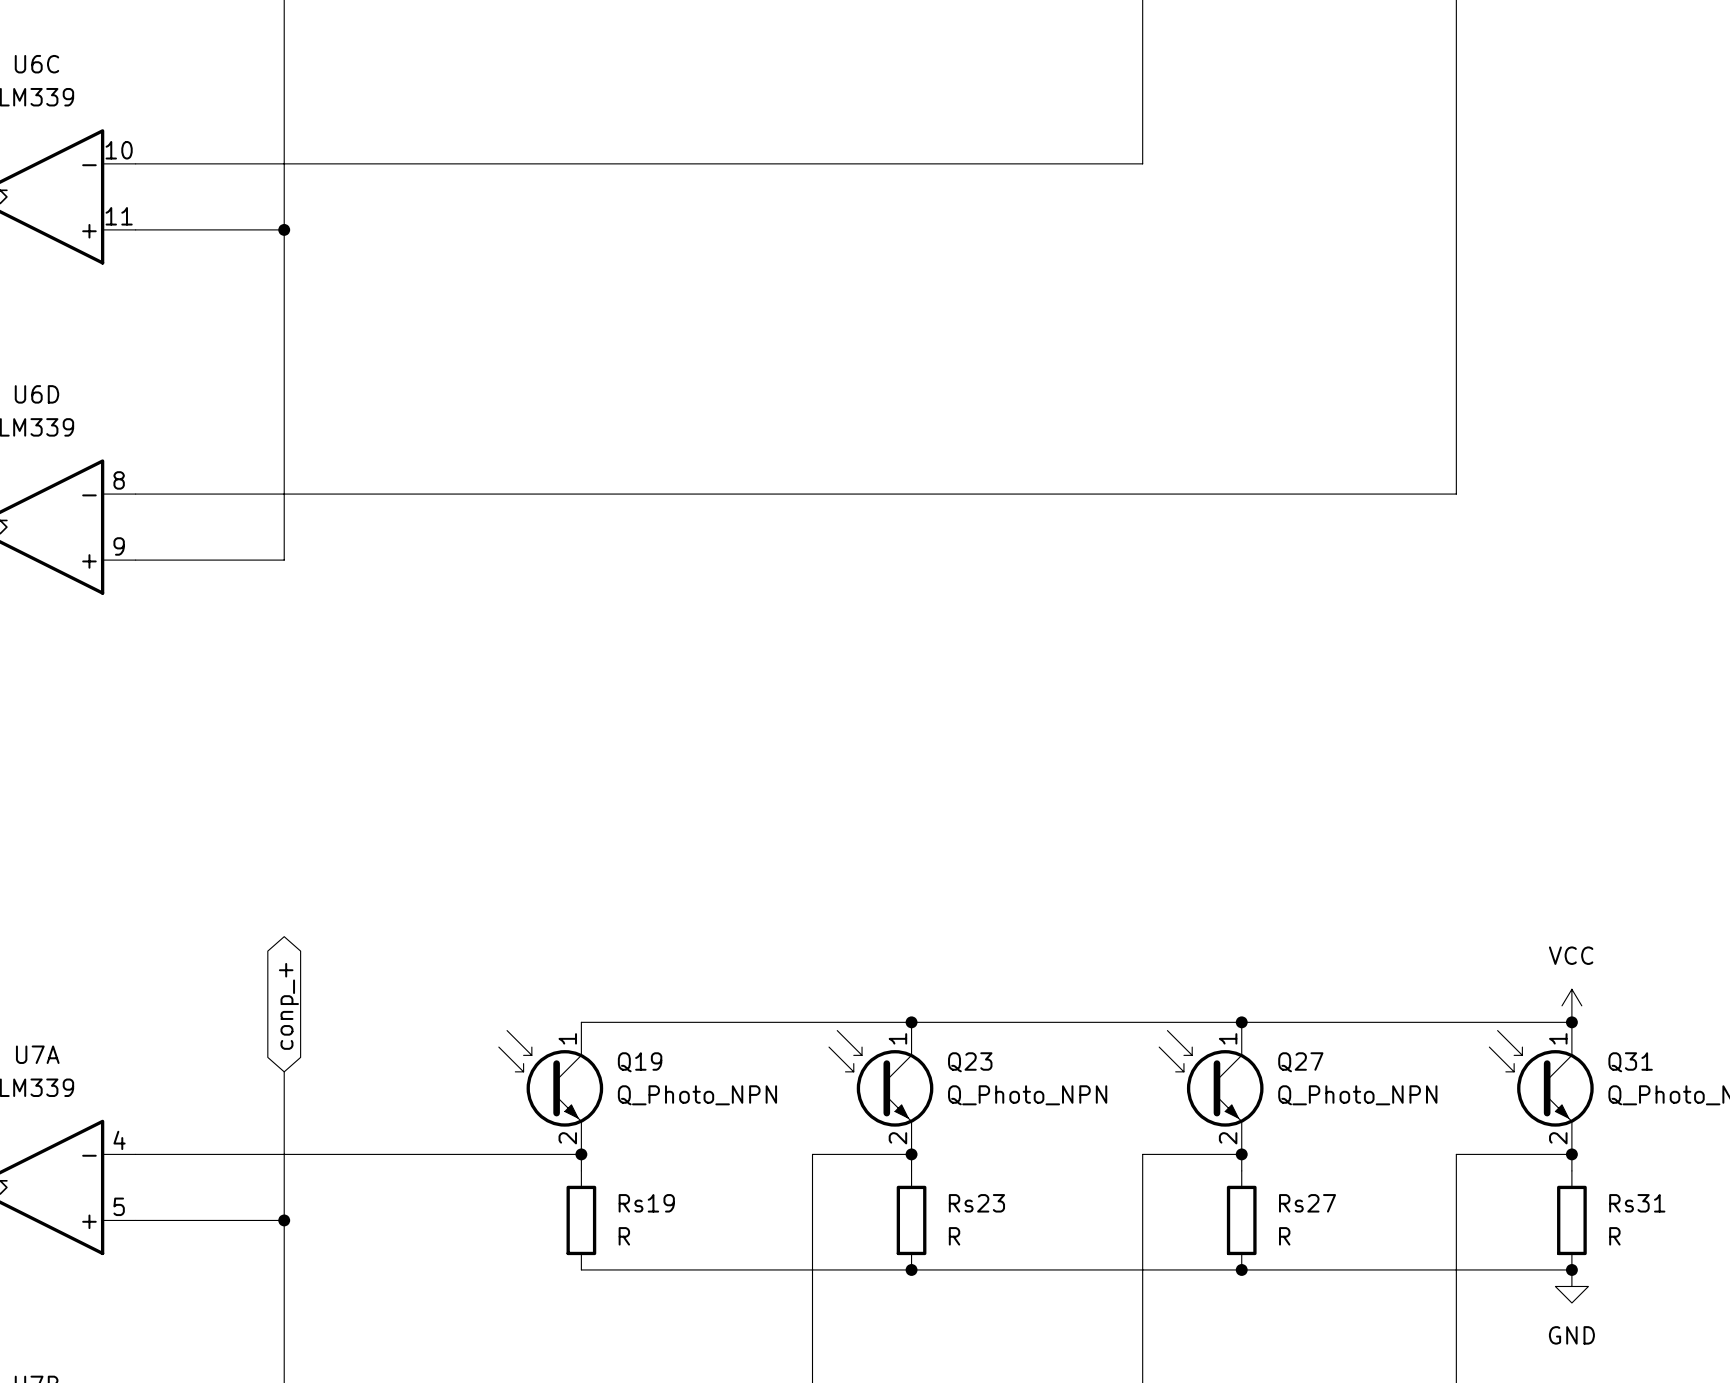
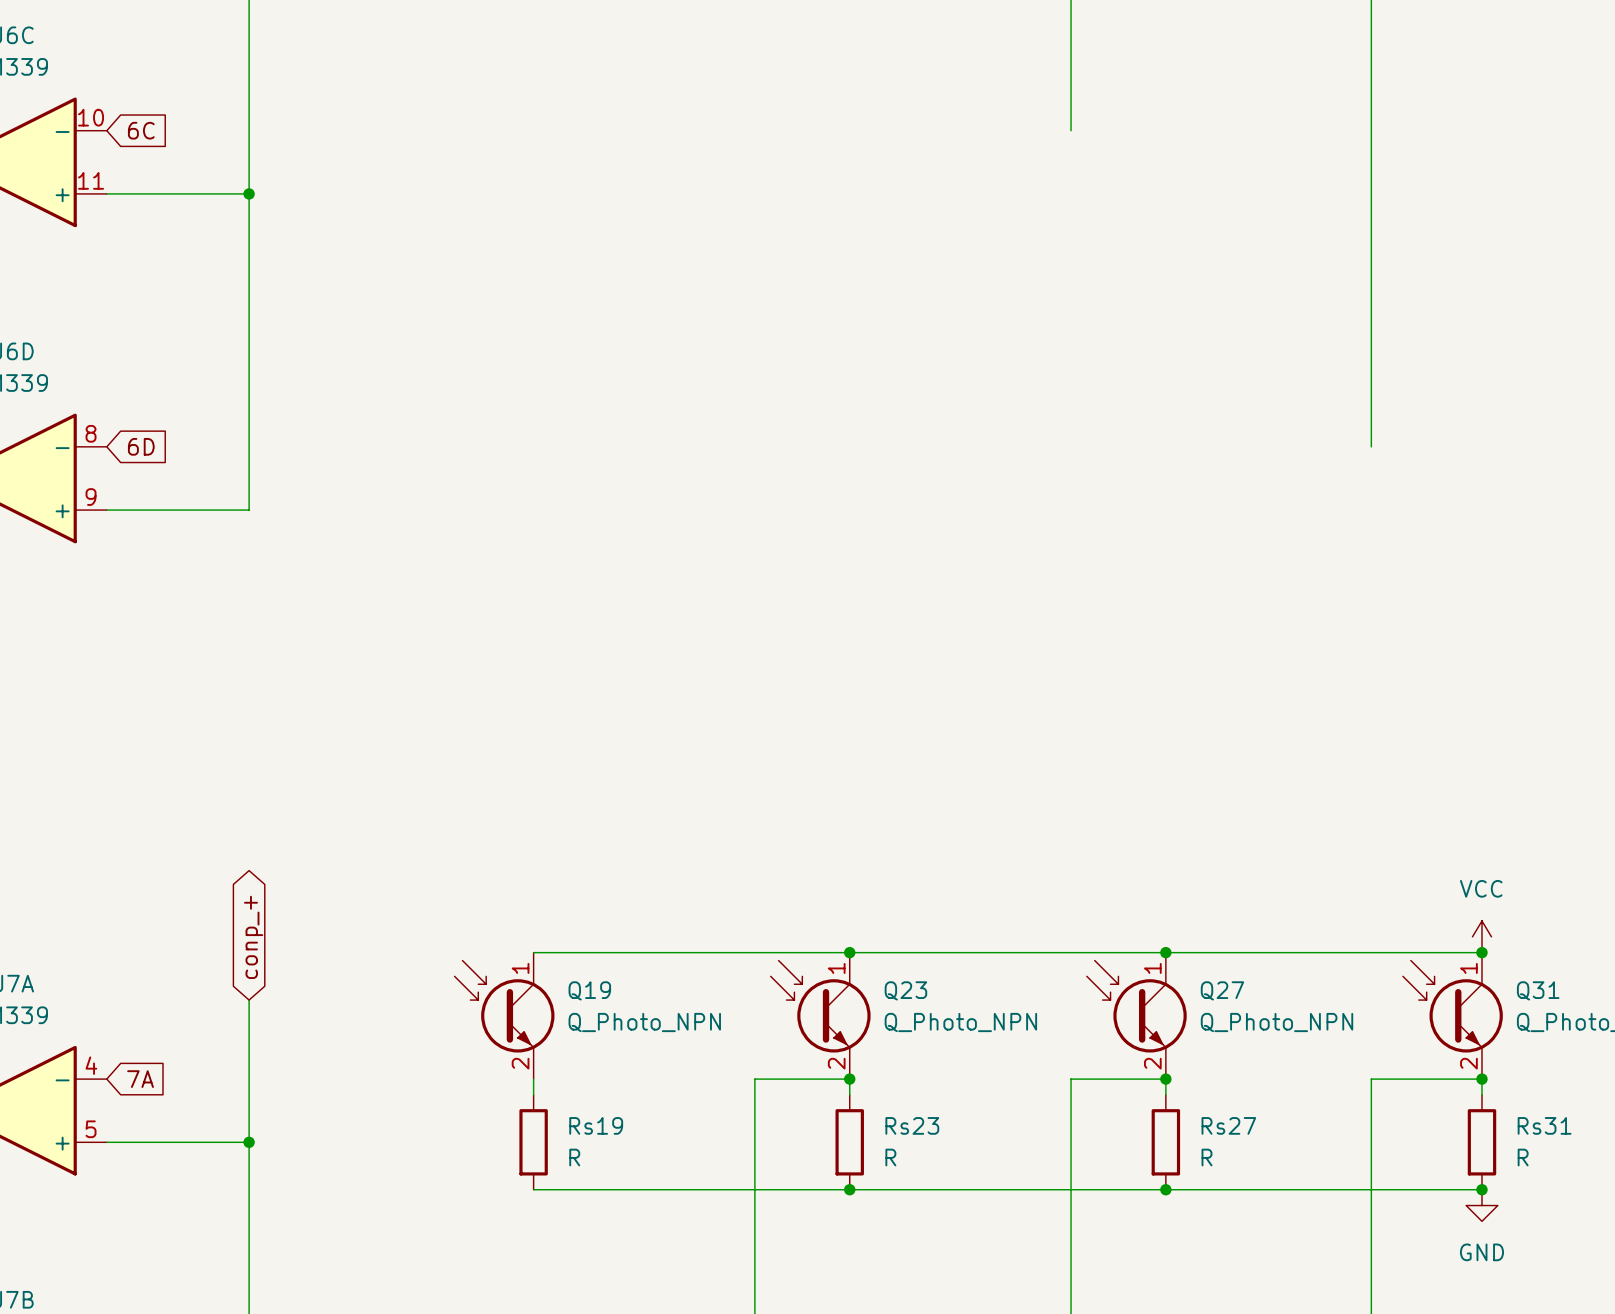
wire: (135, 163) (1142, 163) -> none
global label: none -> 6C (141, 130)
wire: (135, 494) (1456, 494) -> none
global label: none -> 6D (141, 446)
wire: (135, 1154) (581, 1154) -> none
global label: none -> 7A (140, 1079)
junction: (581, 1154) -> none

